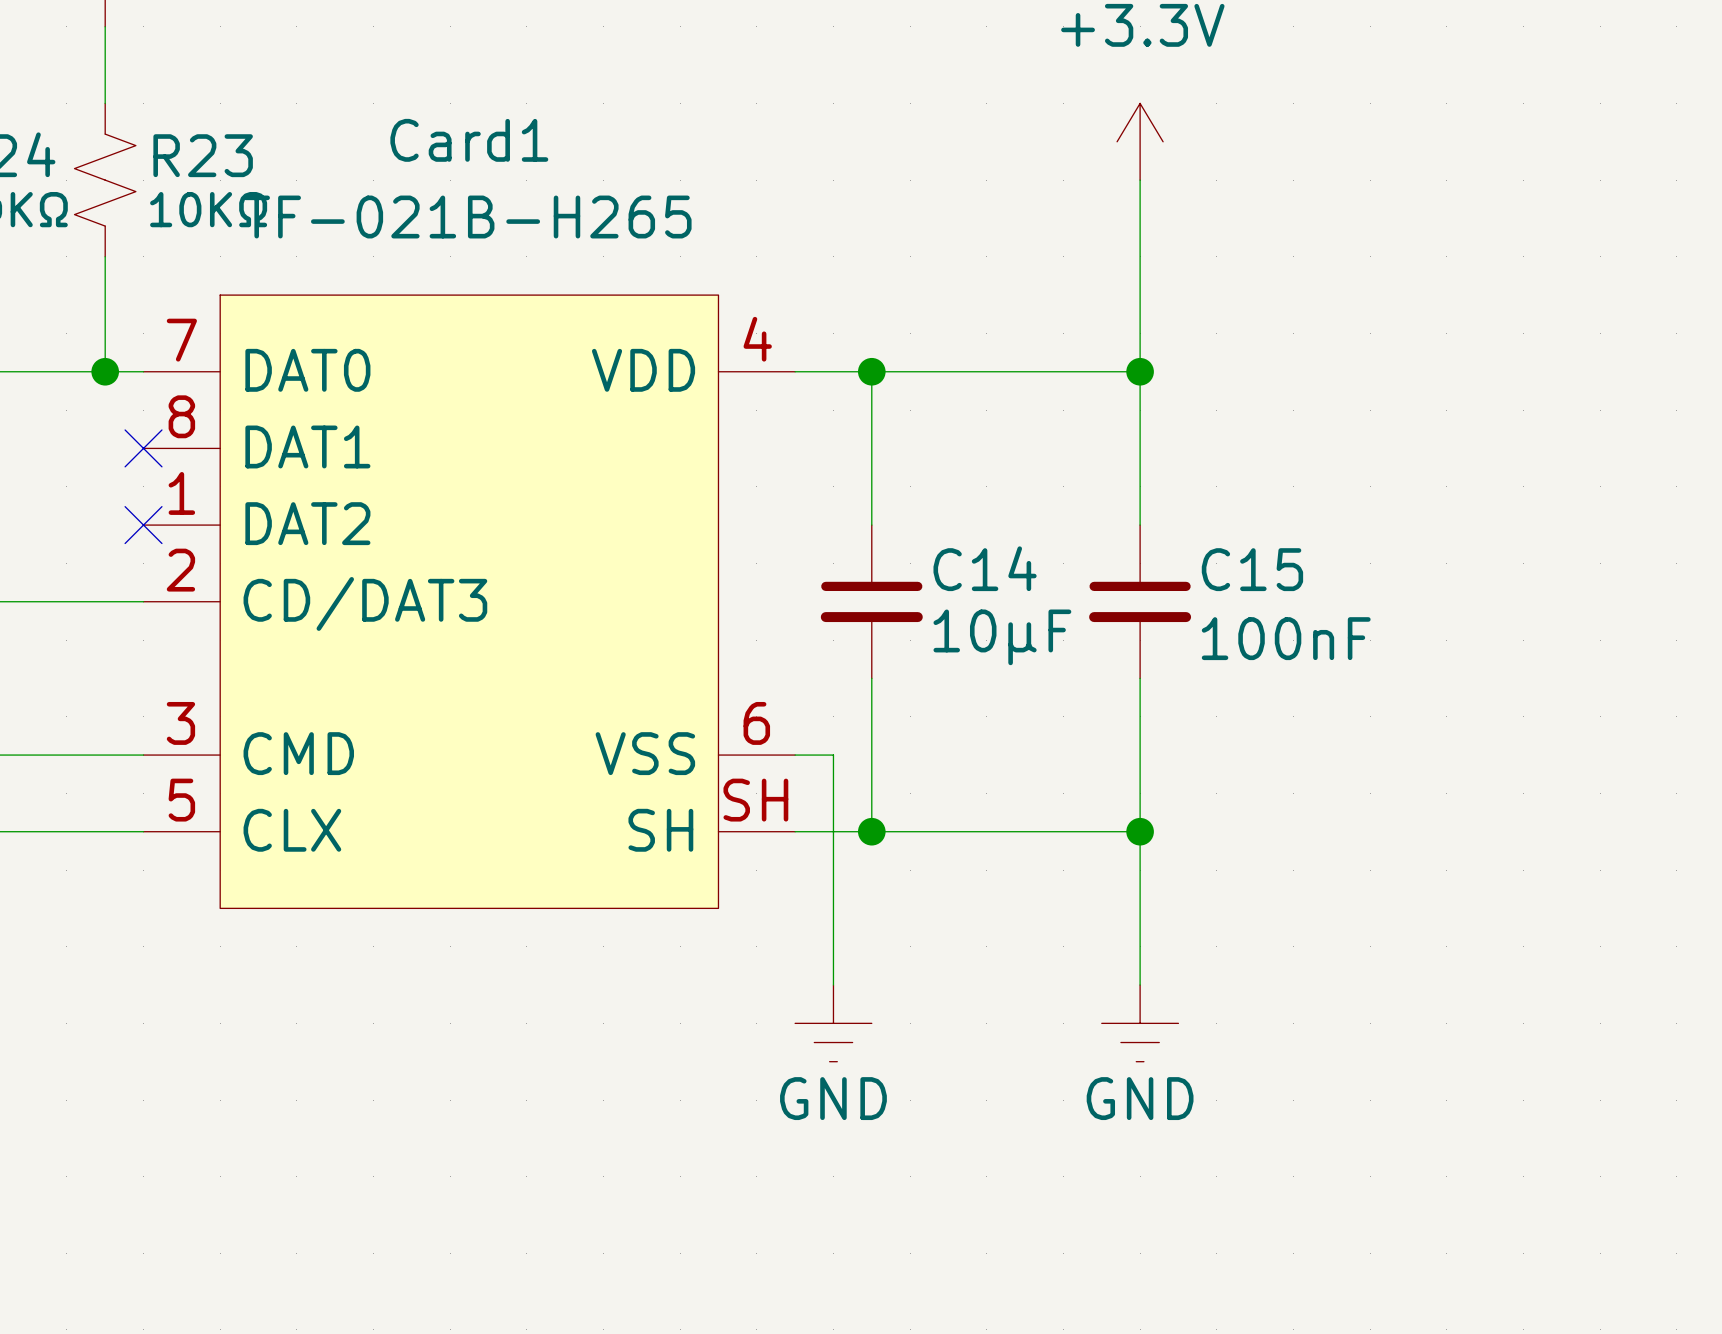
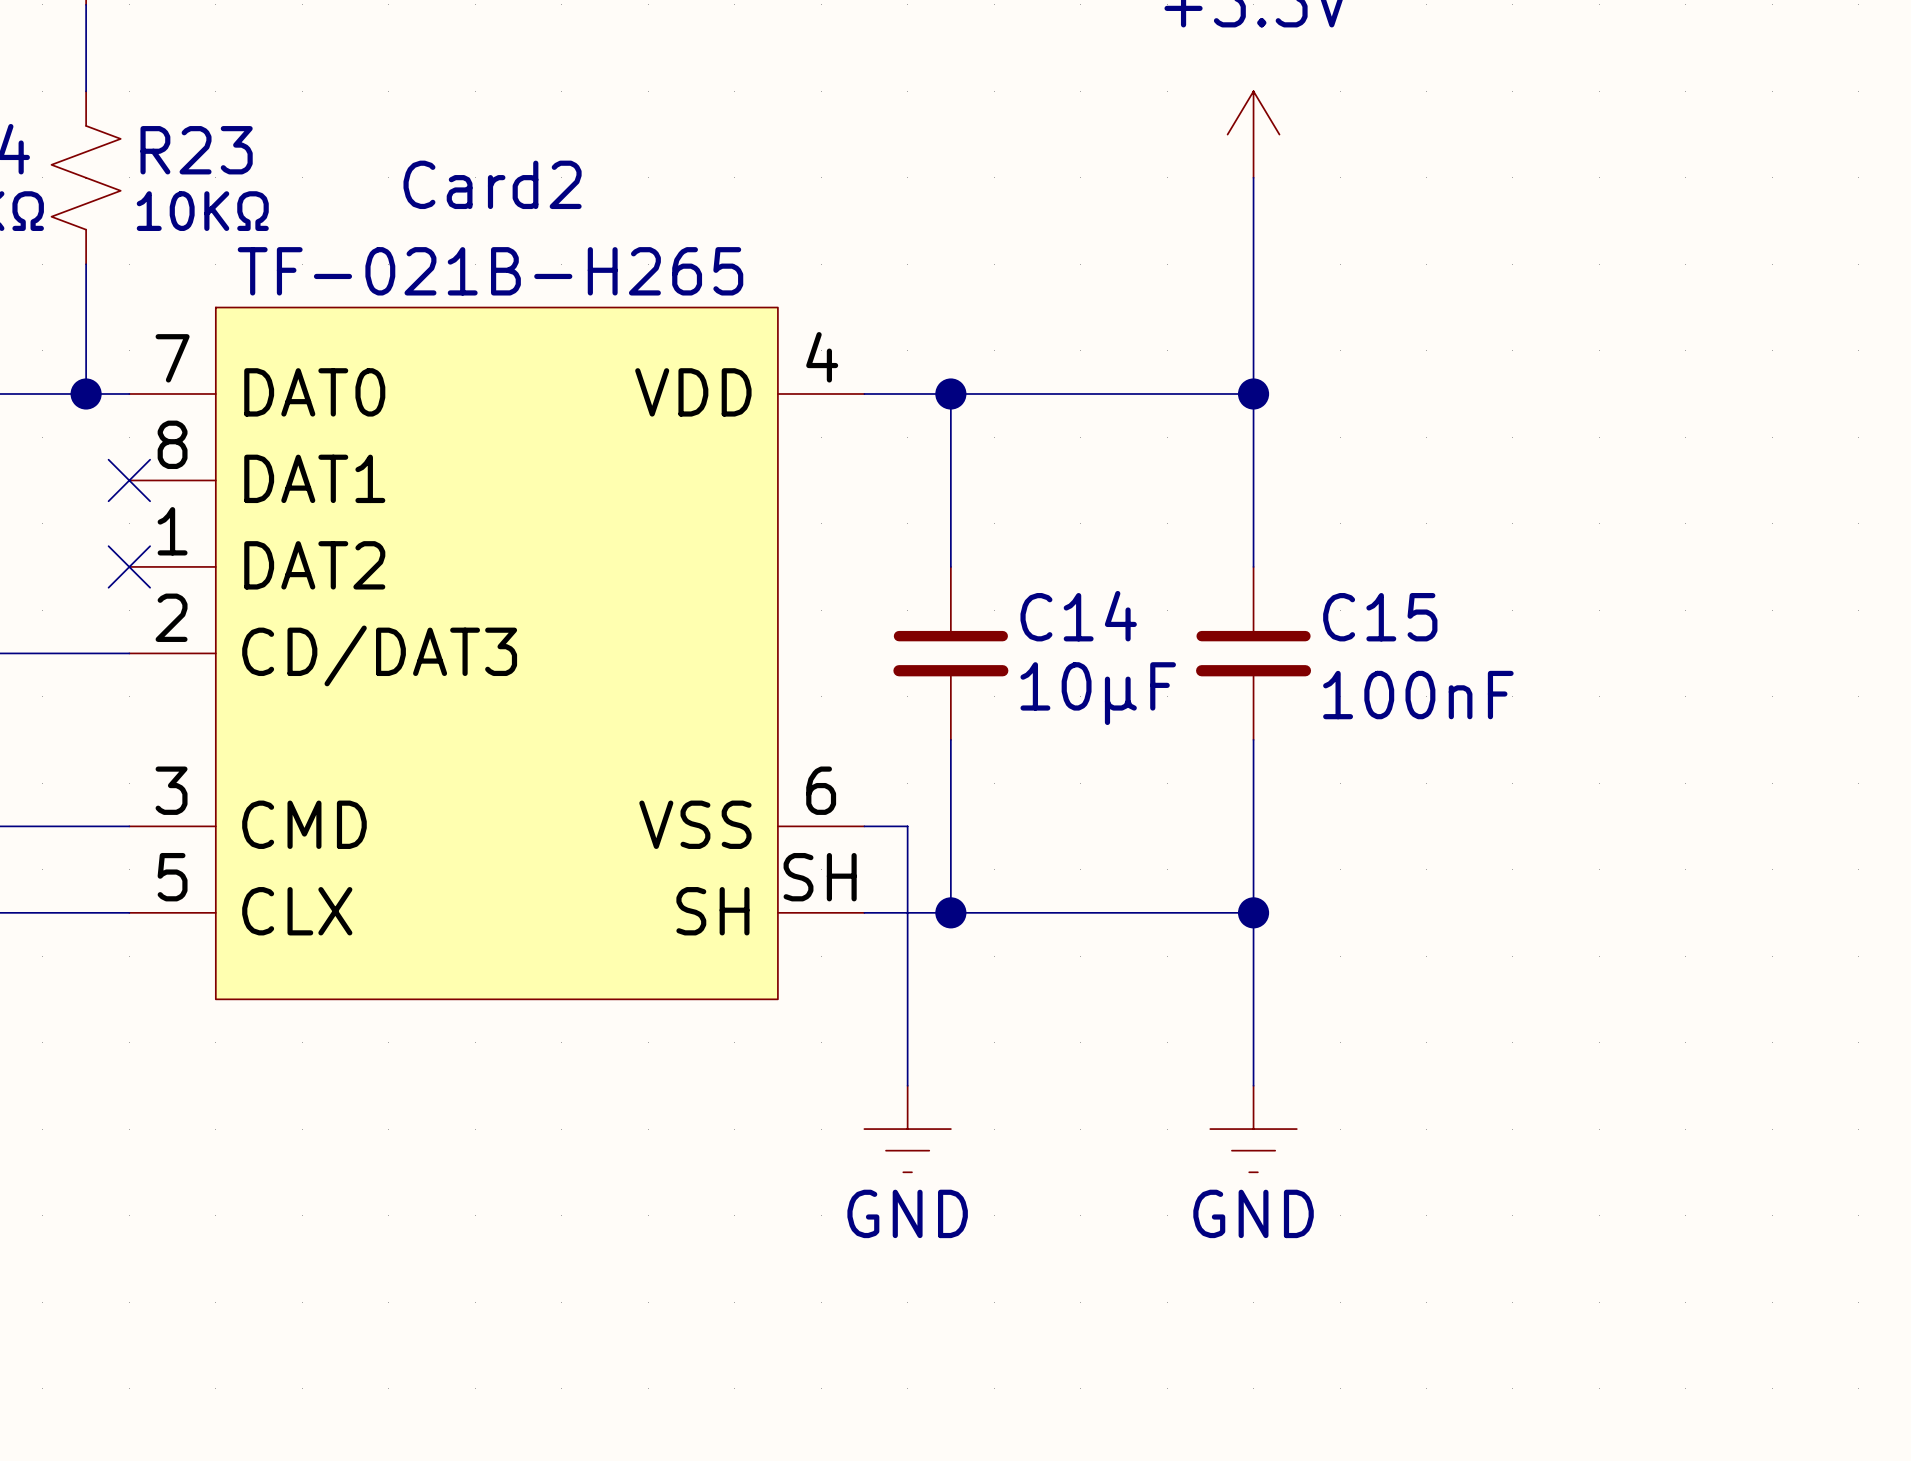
Card1 name: Card1 (469, 140) -> Card2 (492, 184)
Card1 value position: TF-021B-H265 (467, 217) -> TF-021B-H265 (490, 271)

